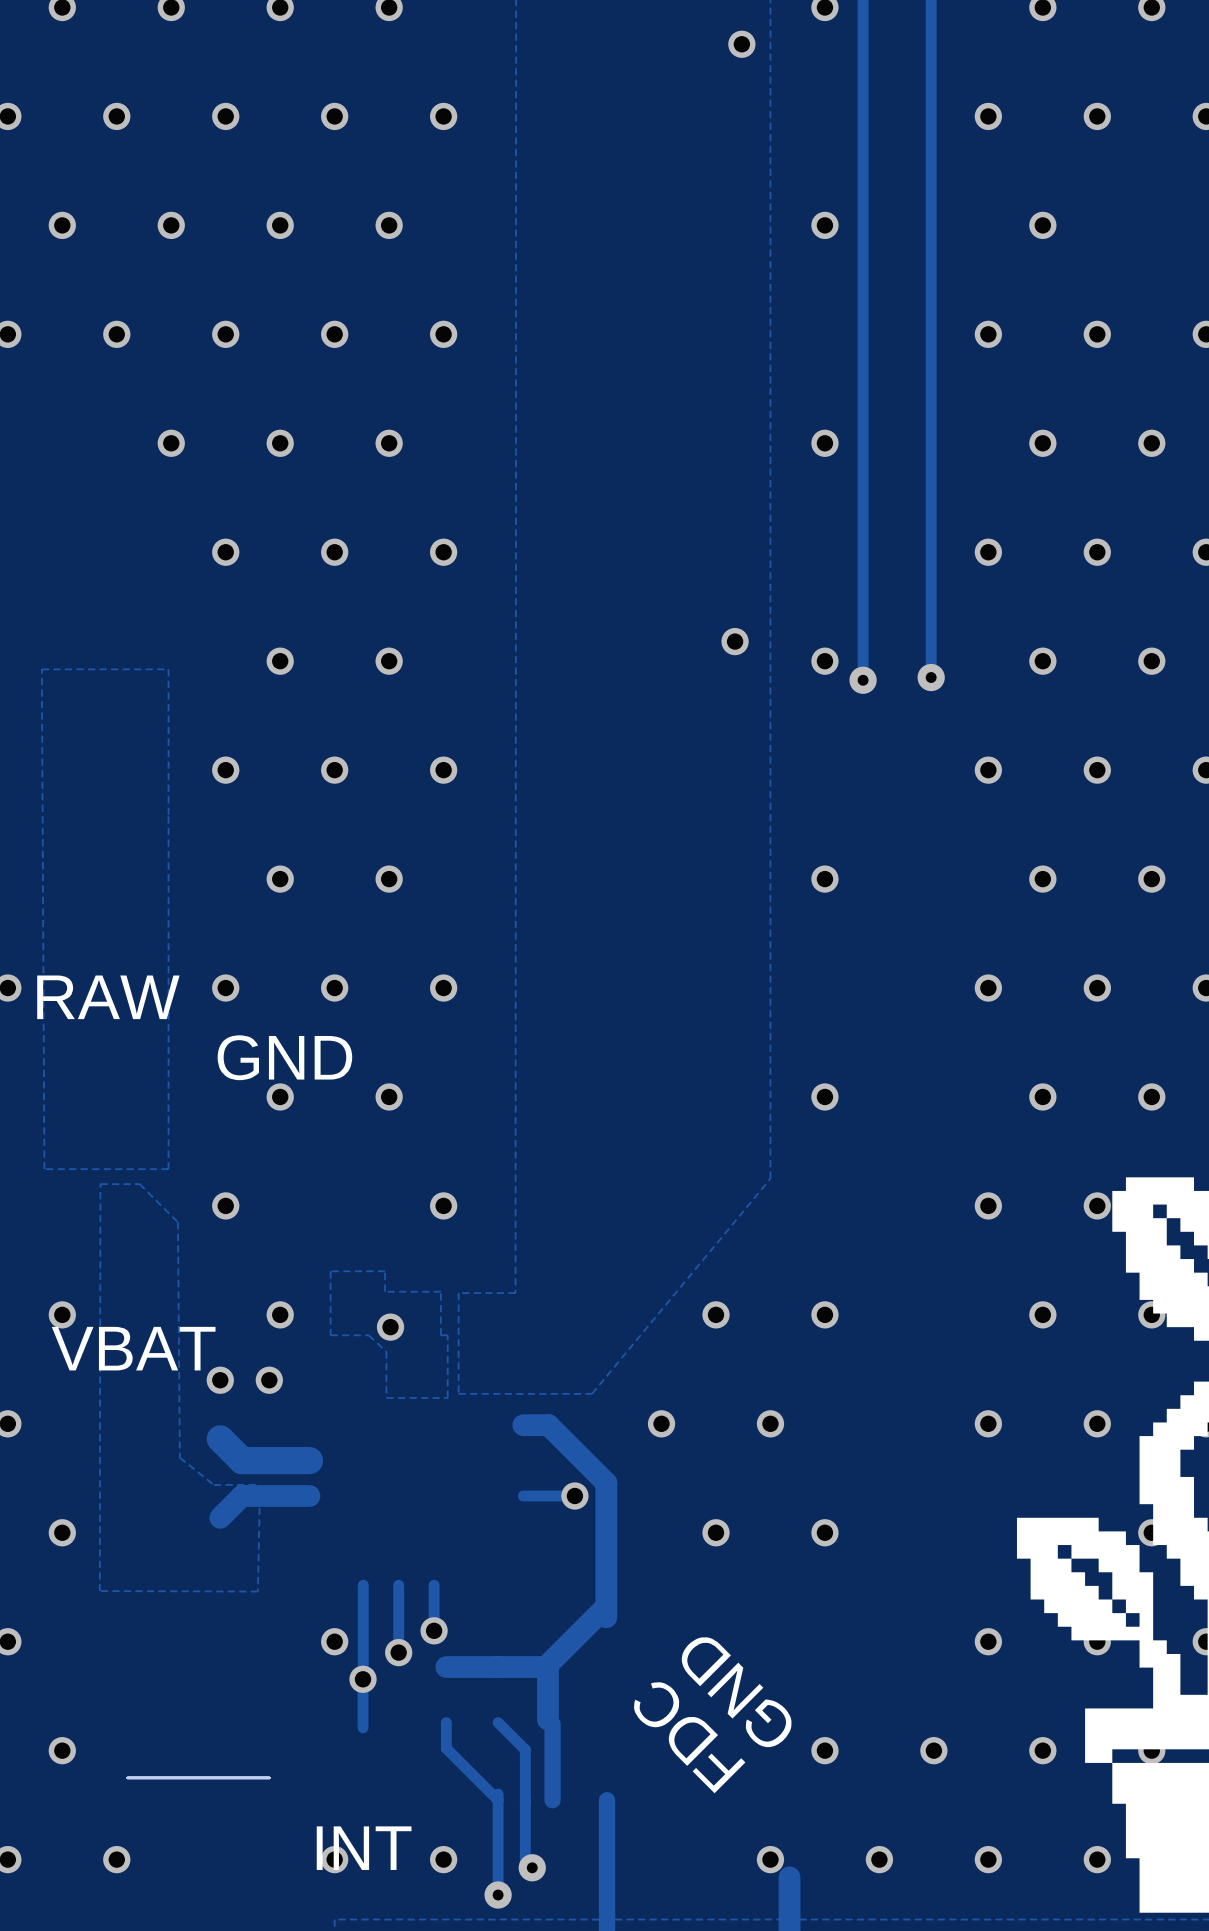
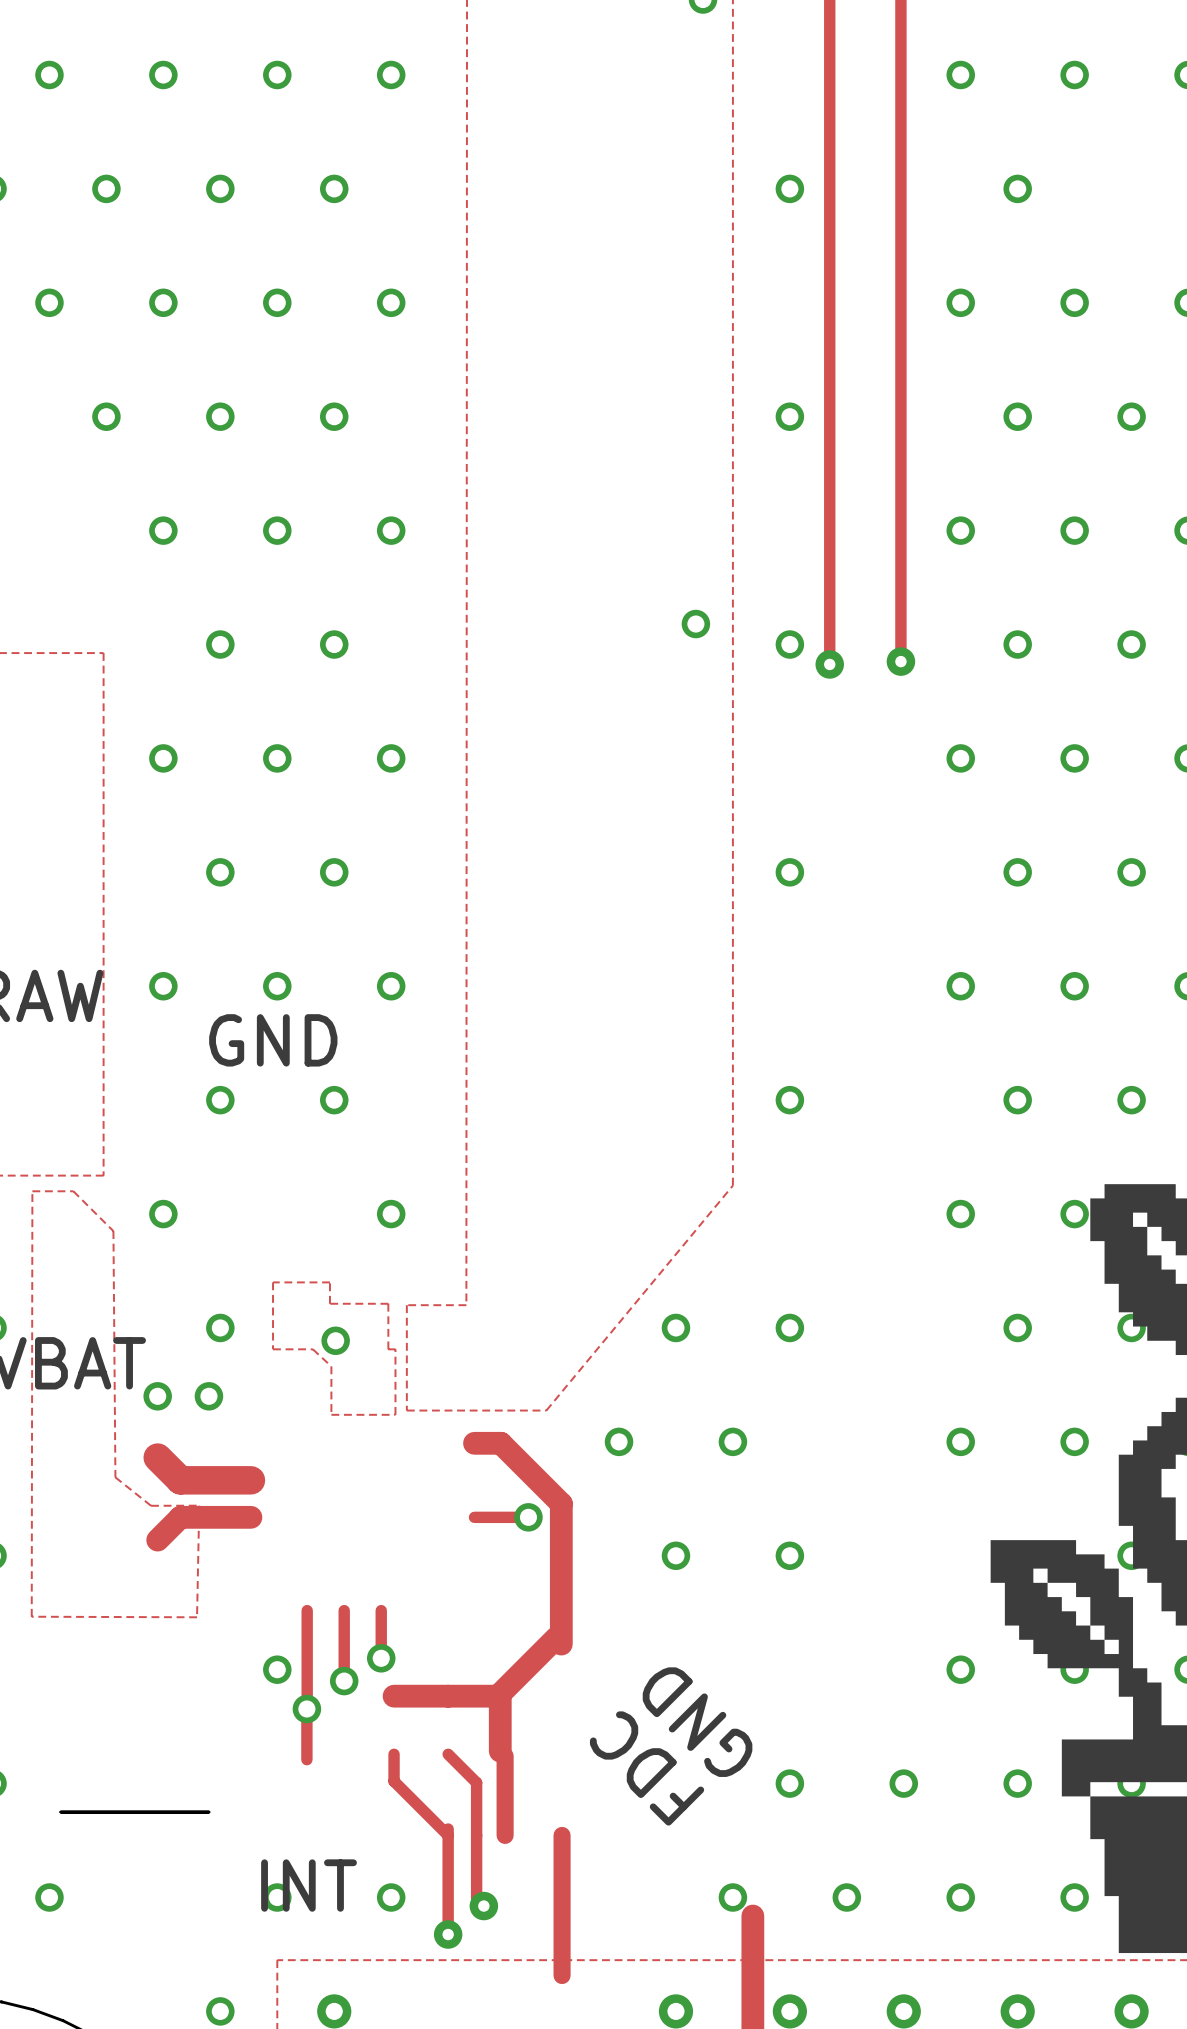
text position: GND (284, 1057) -> GND (273, 1040)

